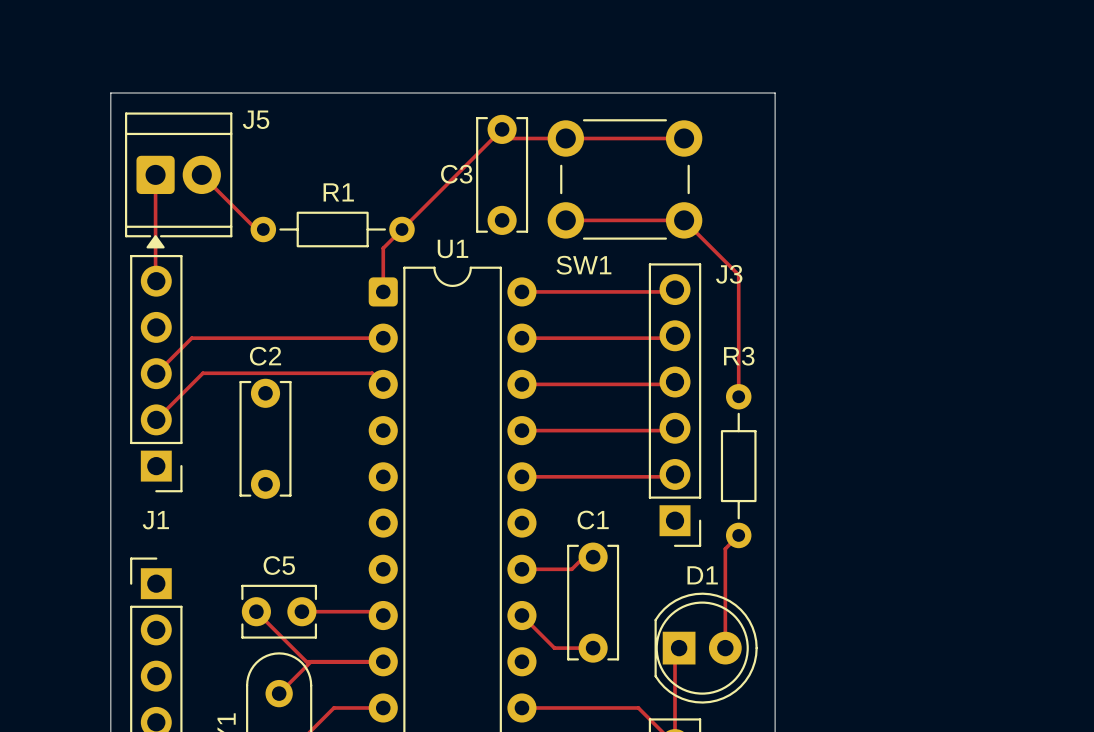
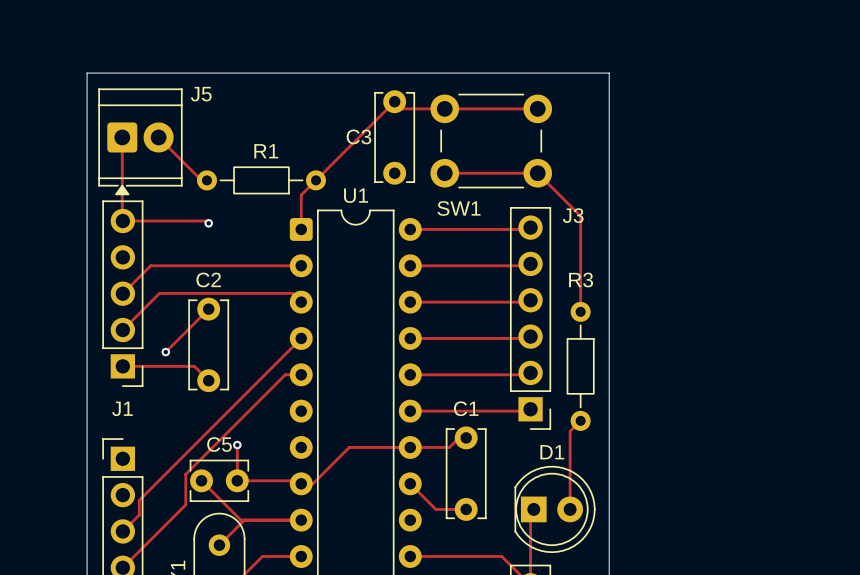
track: none -> (122, 221) (206, 221) (208, 223)
via: none -> (208, 223)
track: none -> (208, 309) (165, 352)
track: none -> (301, 338) (139, 500) (139, 514) (122, 531)
via: none -> (165, 352)
track: none -> (122, 366) (194, 366) (208, 380)
track: none -> (301, 374) (285, 374) (185, 474) (185, 504) (122, 567)
track: none -> (530, 409) (528, 411) (410, 411)
track: none -> (237, 445) (237, 480)
via: none -> (237, 445)
track: none -> (410, 447) (349, 447) (312, 483) (301, 483)

